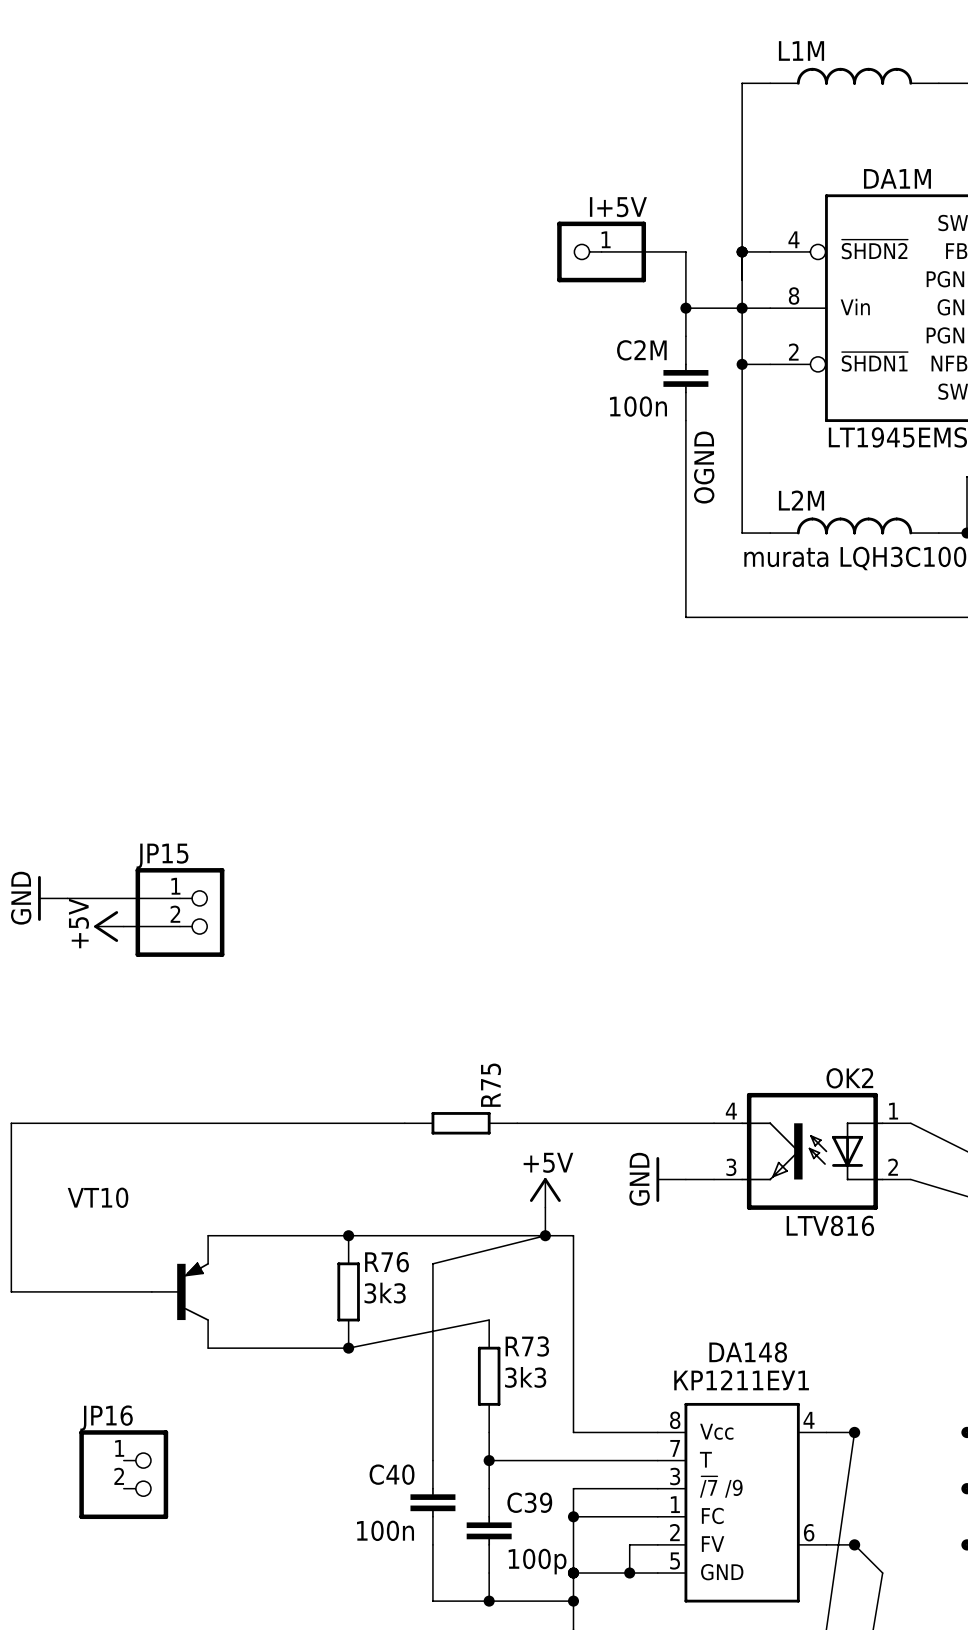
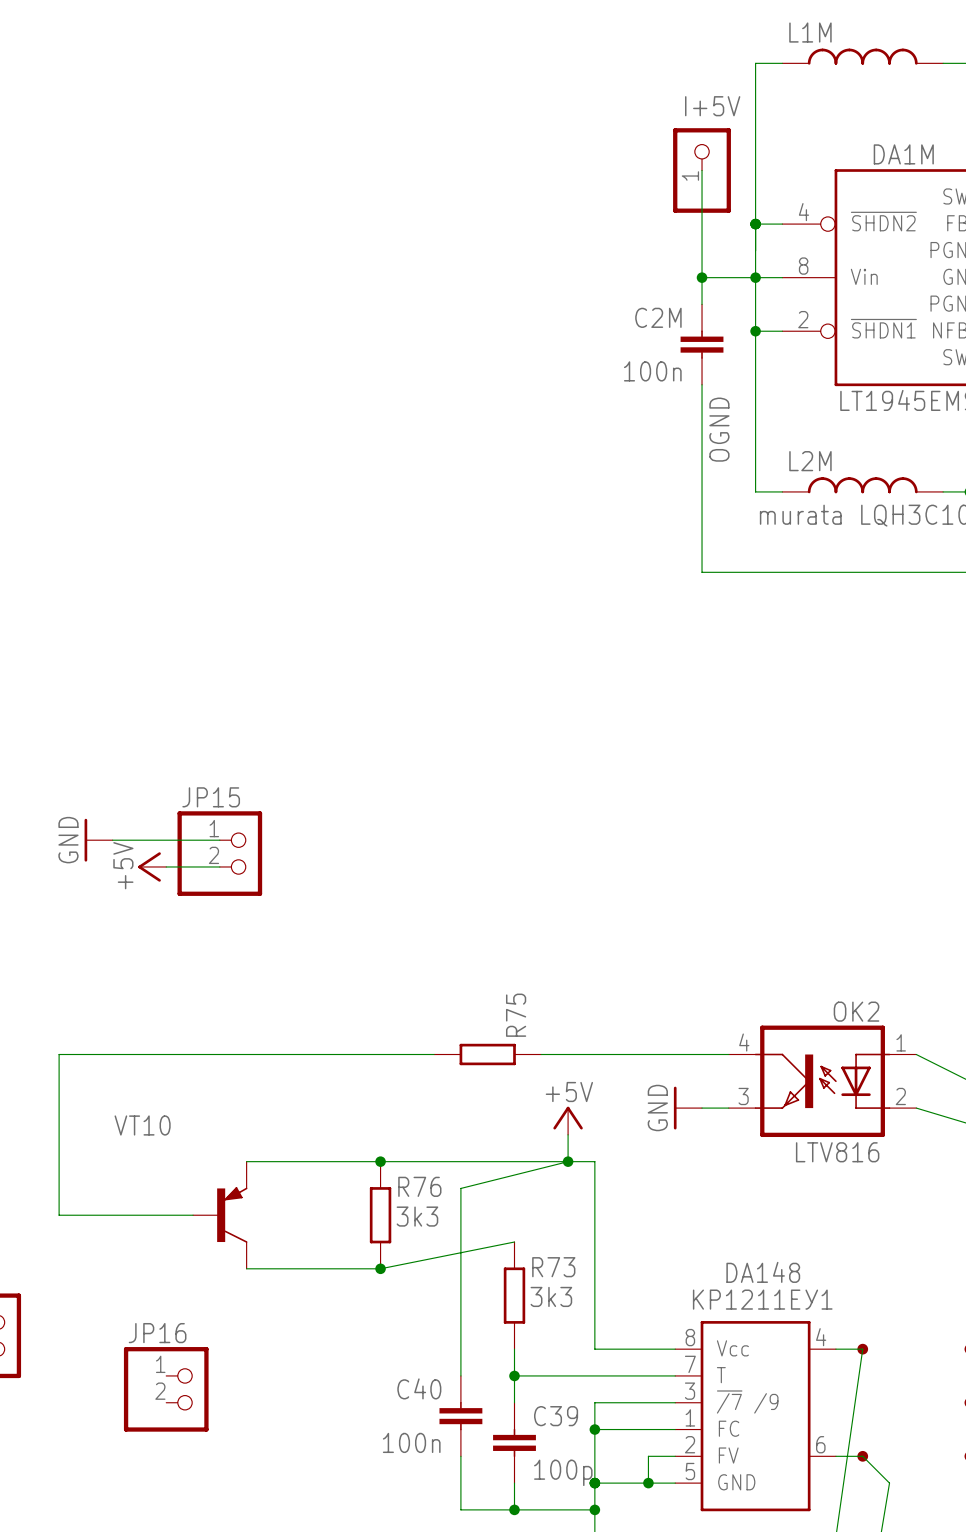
I+5V name position: I+5V (618, 207) -> I+5V (712, 106)
wire: (601, 251) (685, 251) -> (702, 170) (702, 224)
I+5V rotation: 0° (601, 251) -> 90° clockwise (702, 170)
I+5V position: (601, 251) -> (702, 170)

